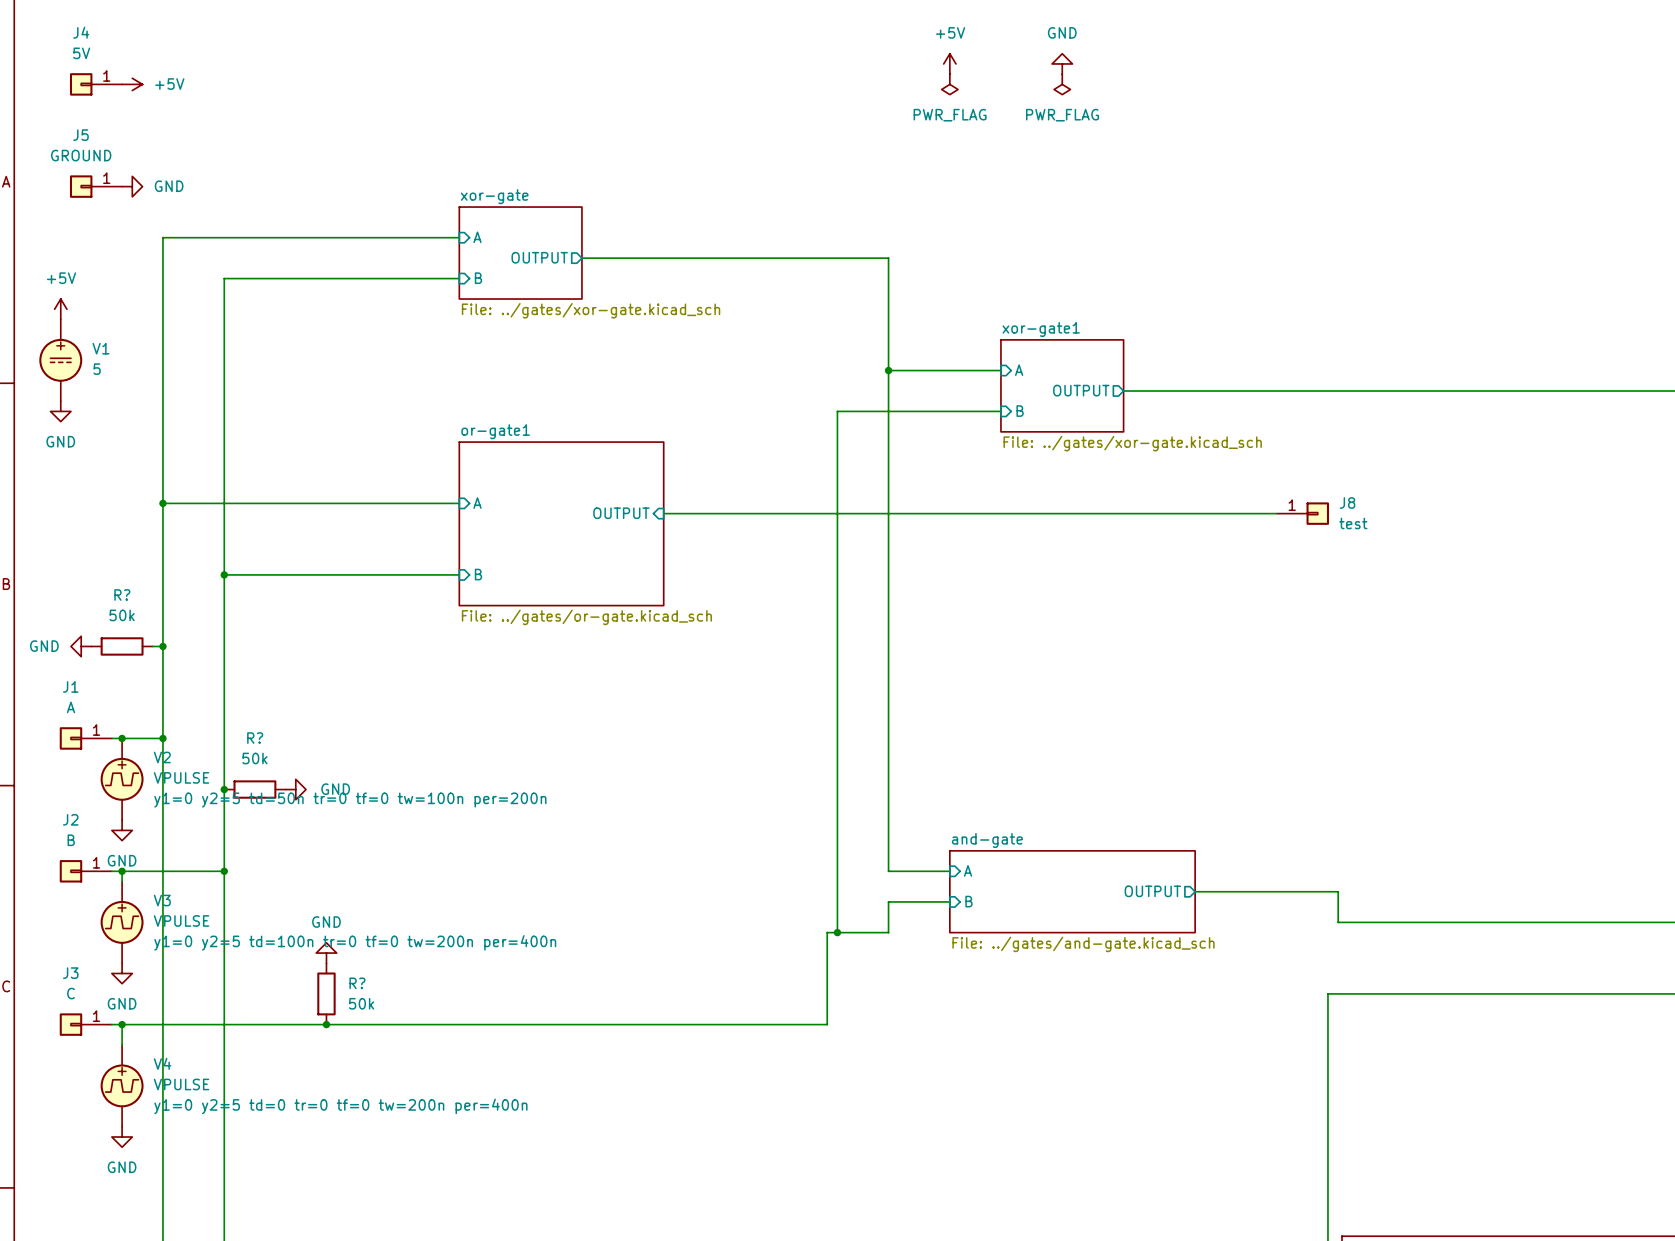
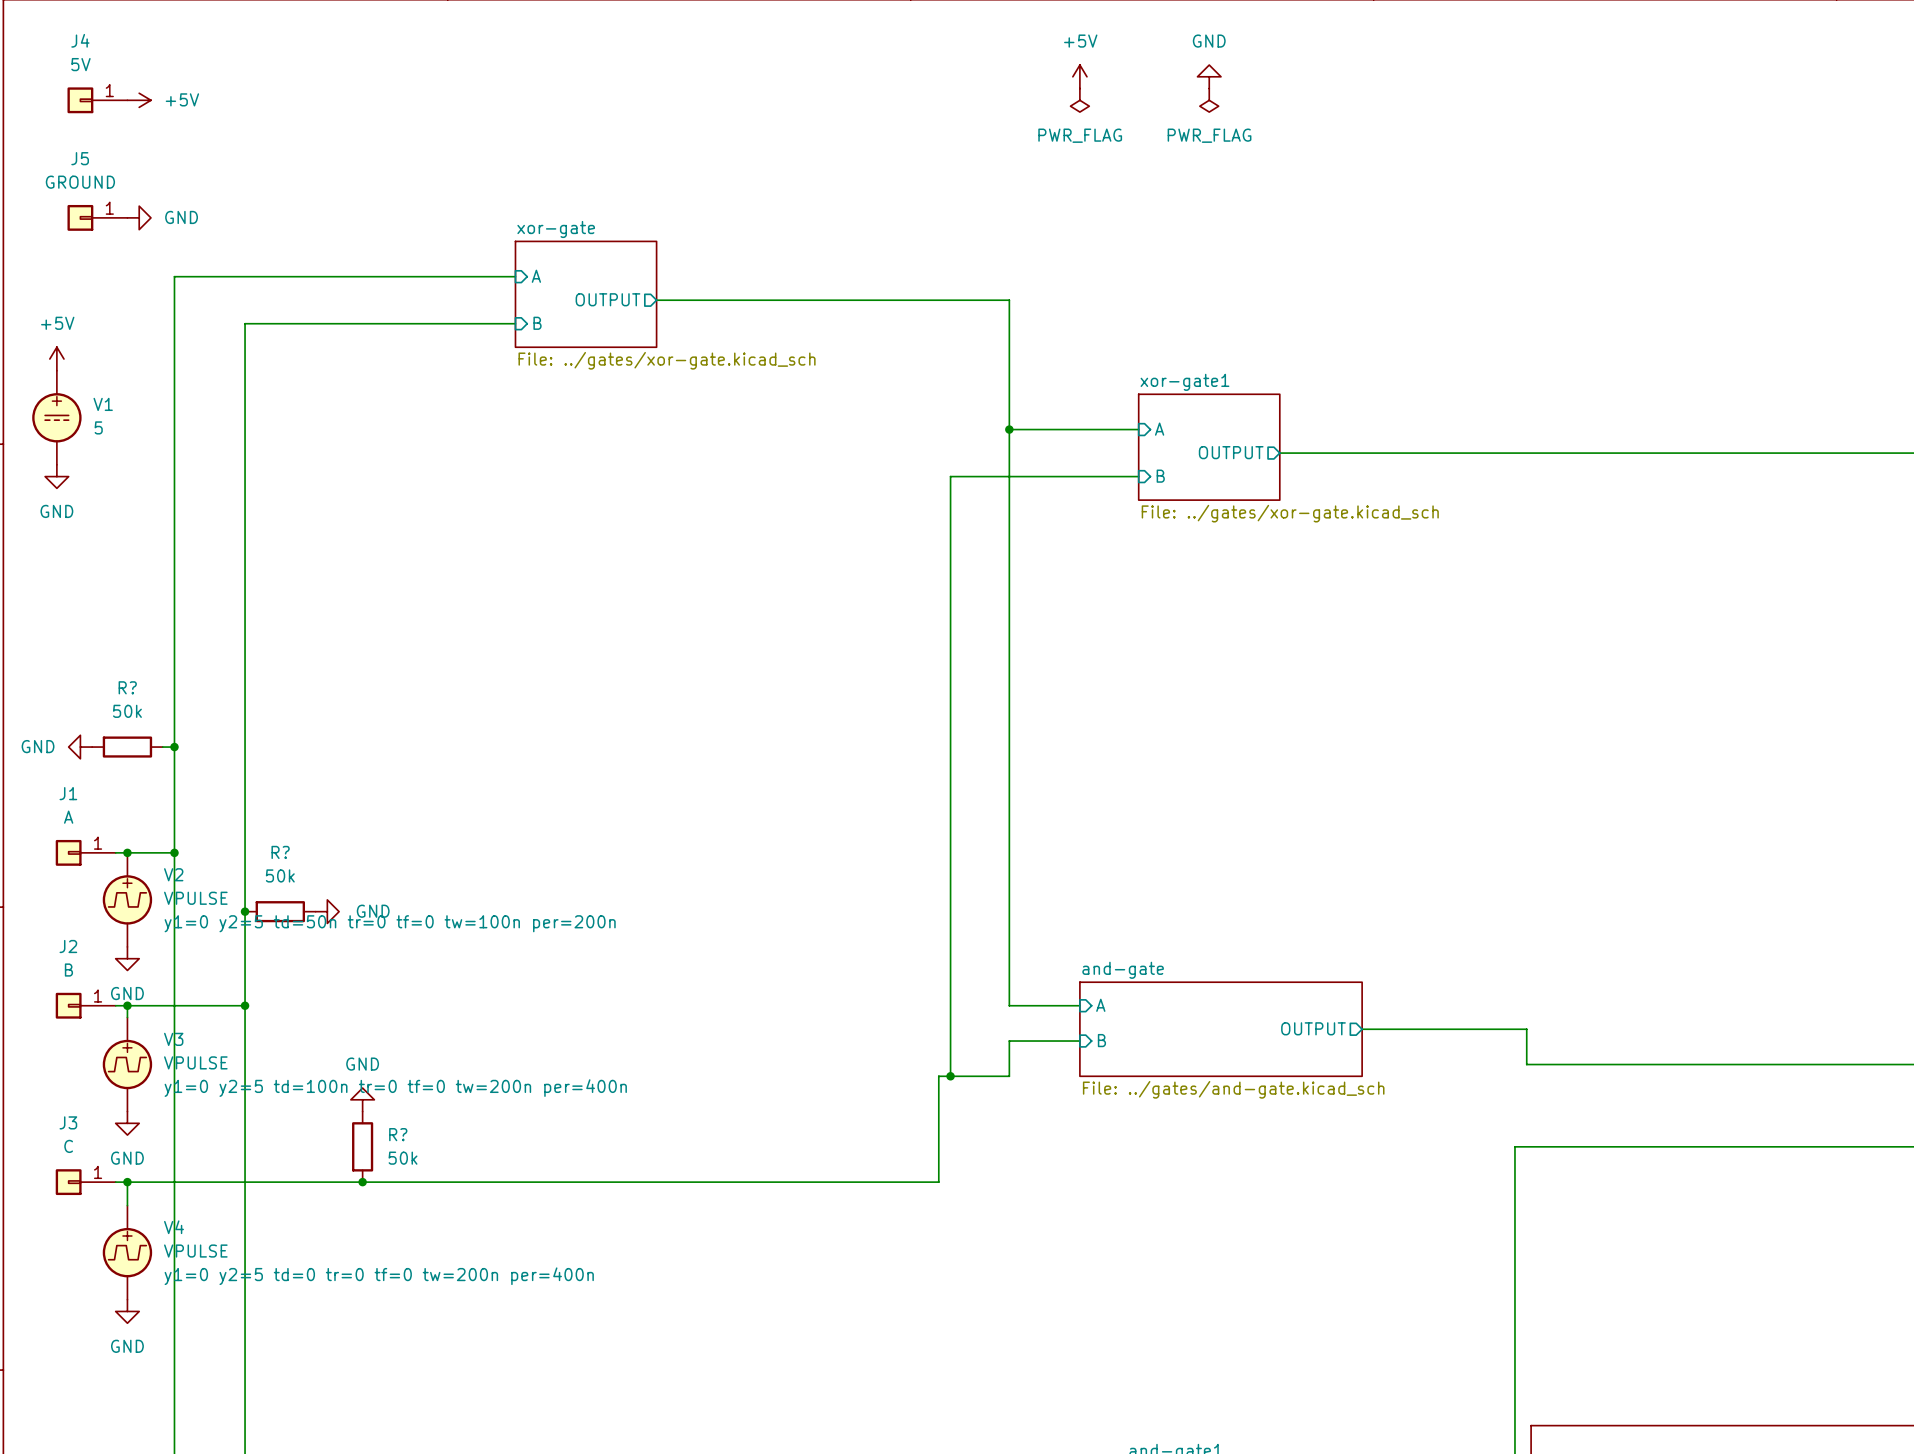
wire: (162, 503) (459, 503) -> none
junction: (162, 503) -> none
sheet pin: A (477, 503) -> none
sheet pin: OUTPUT (621, 513) -> none
wire: (663, 513) (1276, 513) -> none
J8: test (1302, 513) -> none
sheet or-gate1: File: ../gates/or-gate.kicad_sch (561, 523) -> none
wire: (224, 574) (459, 574) -> none
junction: (224, 574) -> none
sheet pin: B (478, 574) -> none

